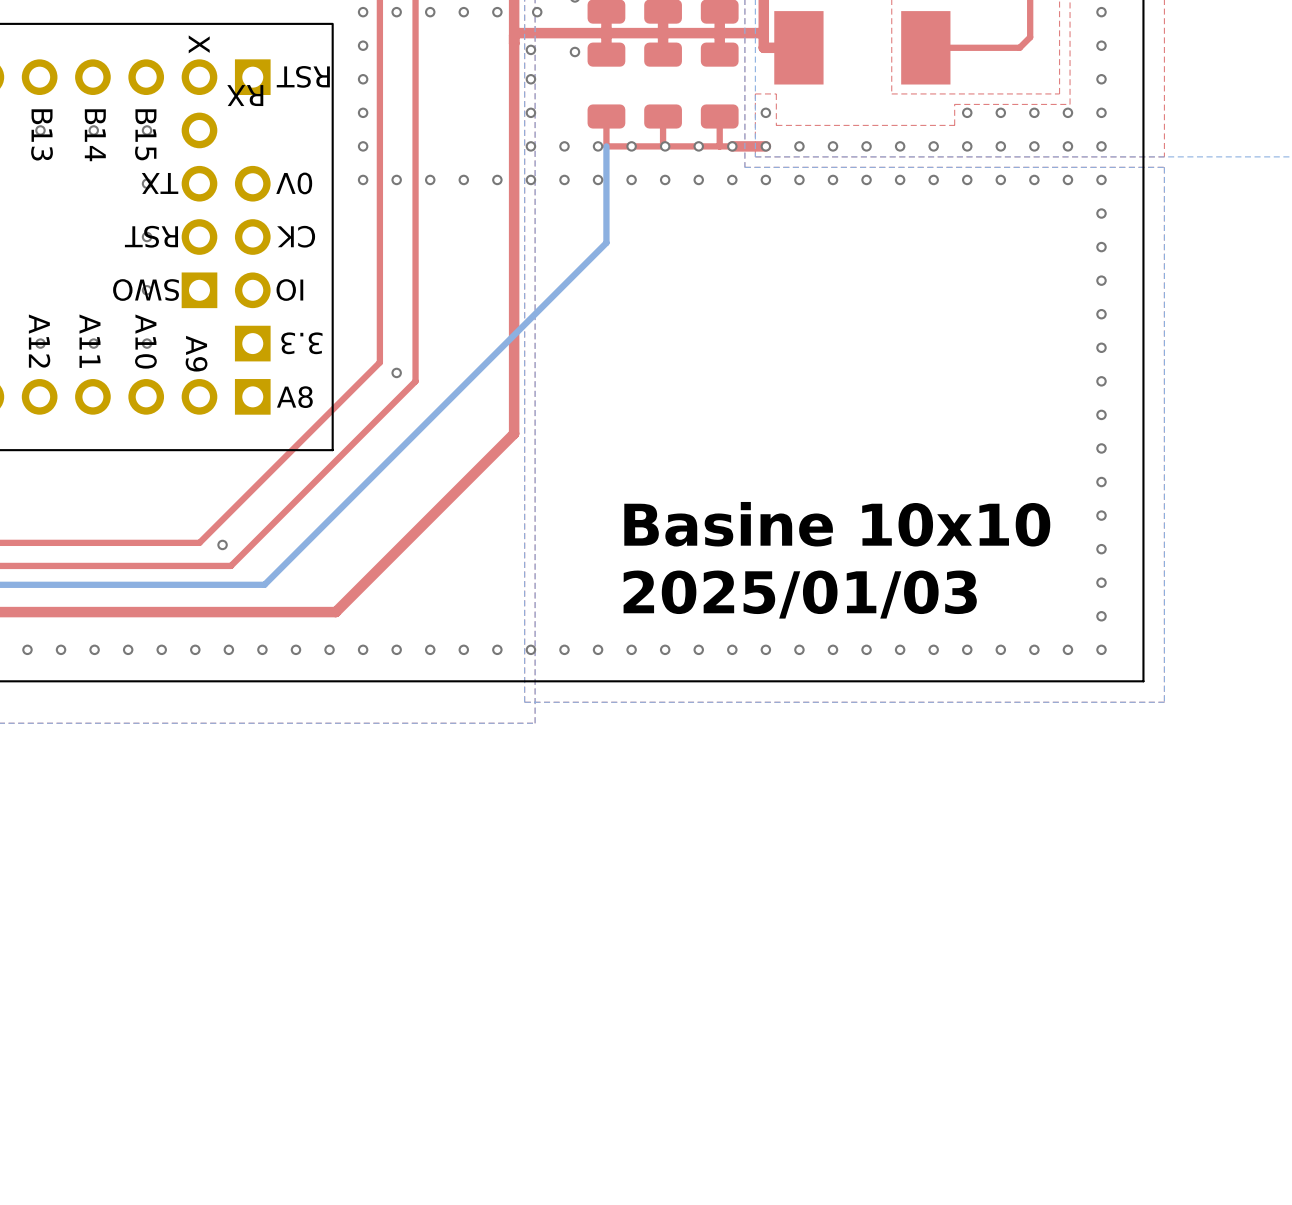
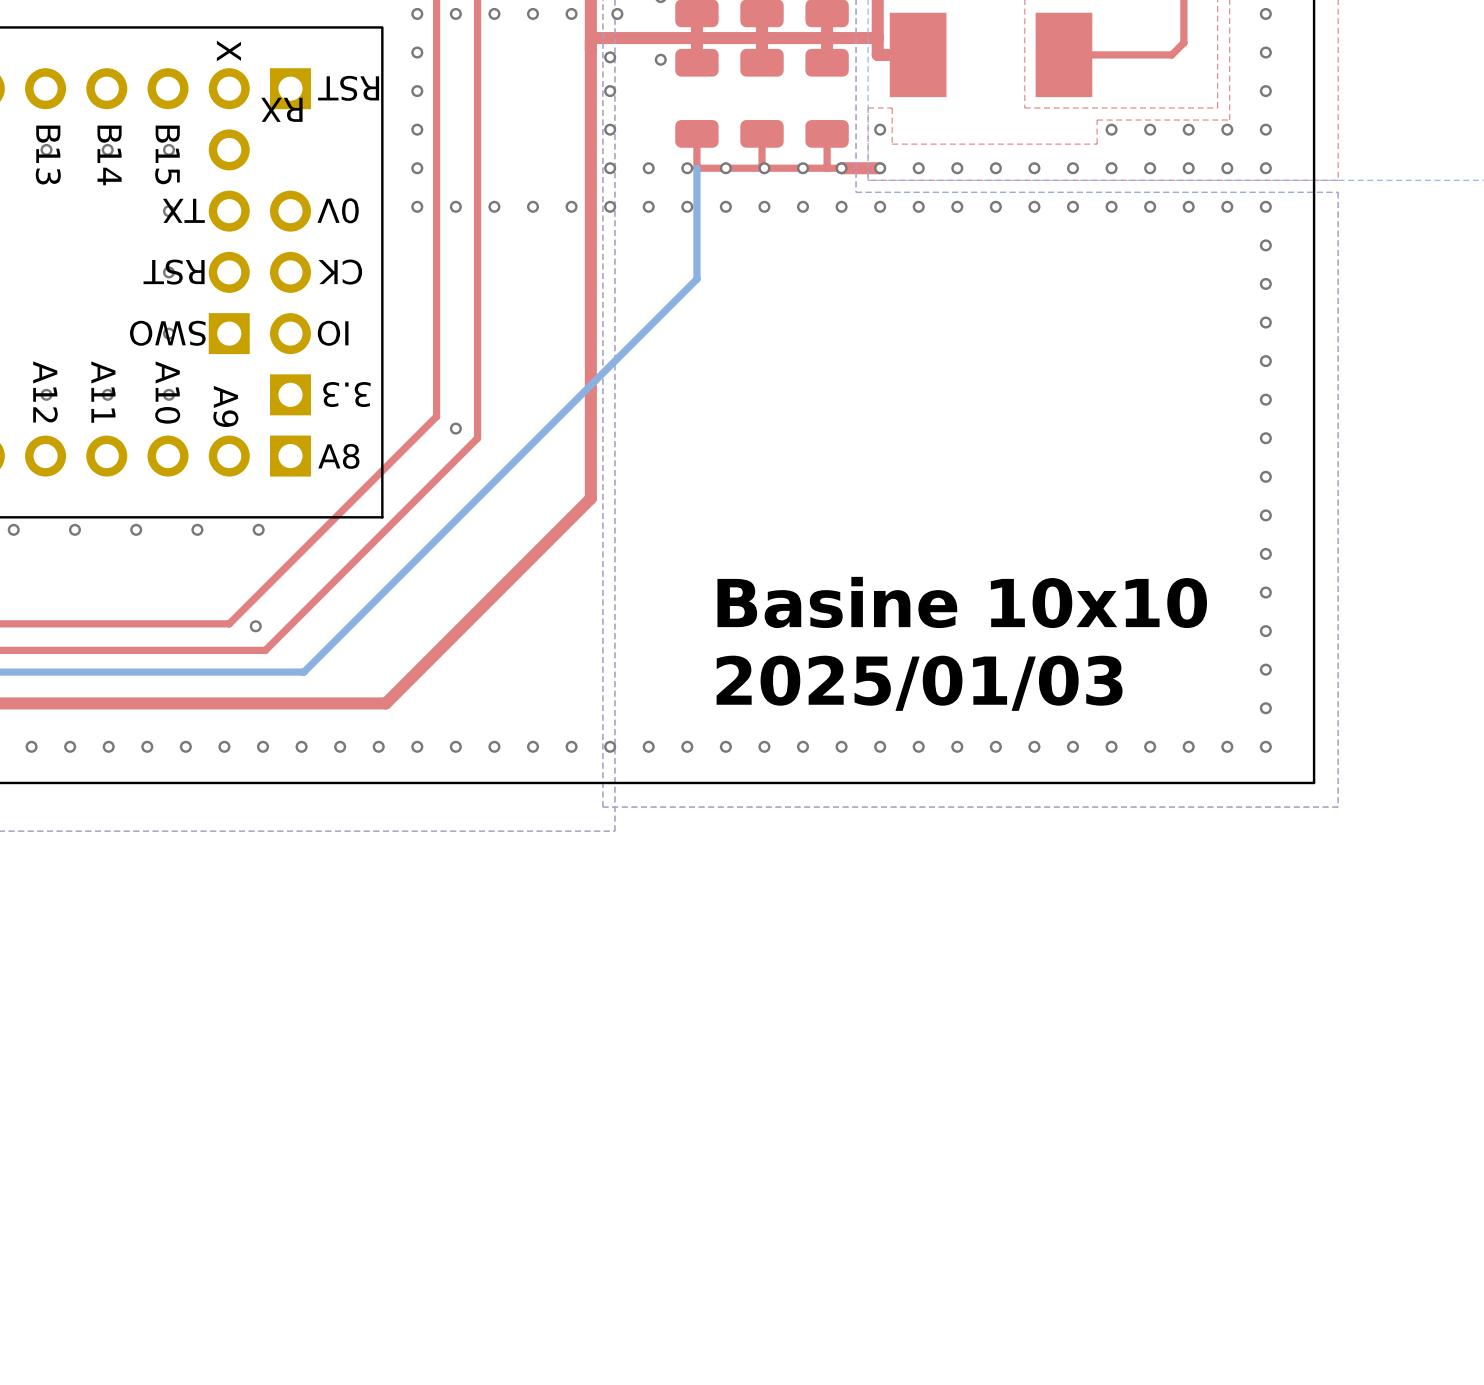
via: none -> (13, 529)
via: none -> (74, 529)
via: none -> (136, 529)
via: none -> (197, 529)
via: none -> (258, 529)

